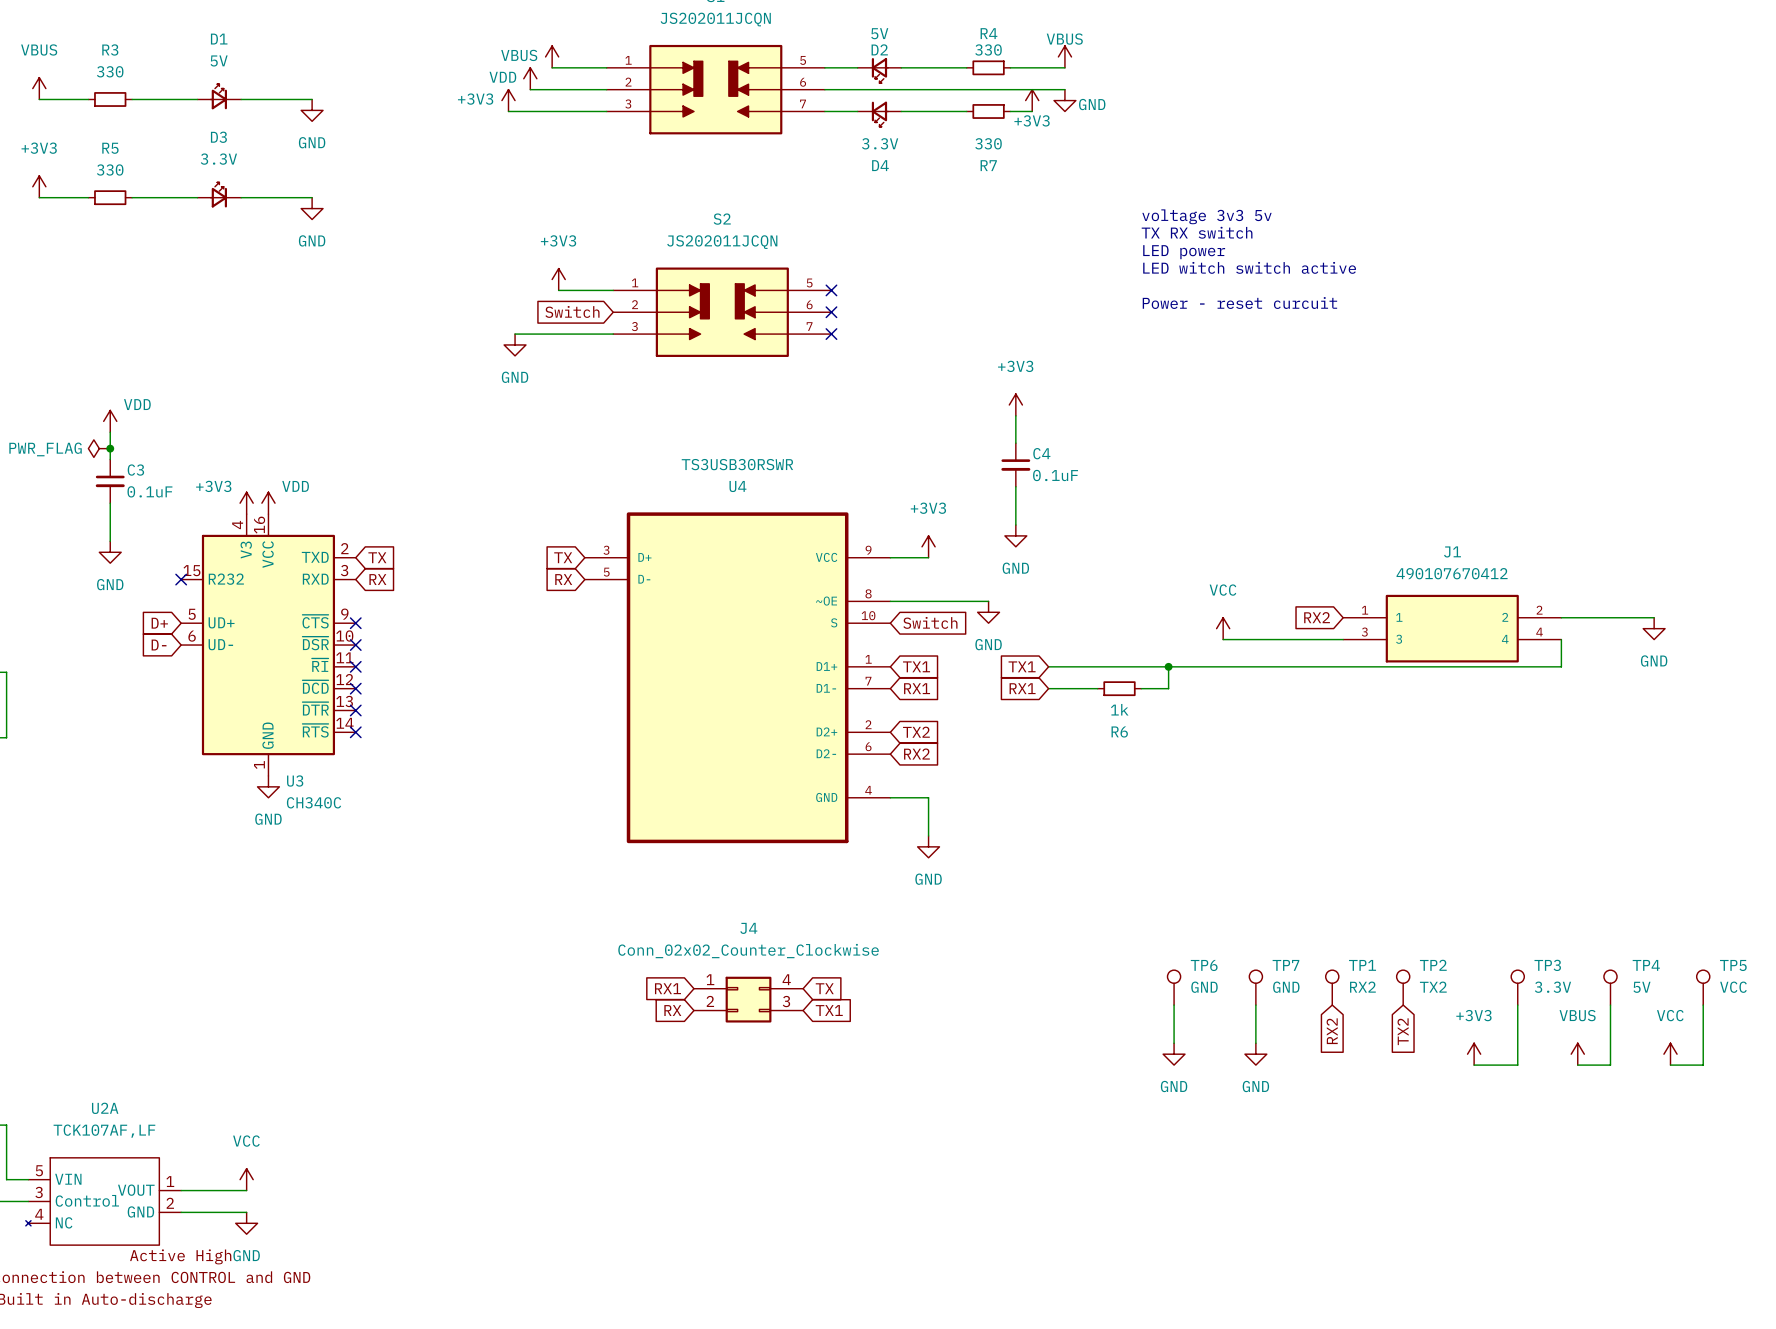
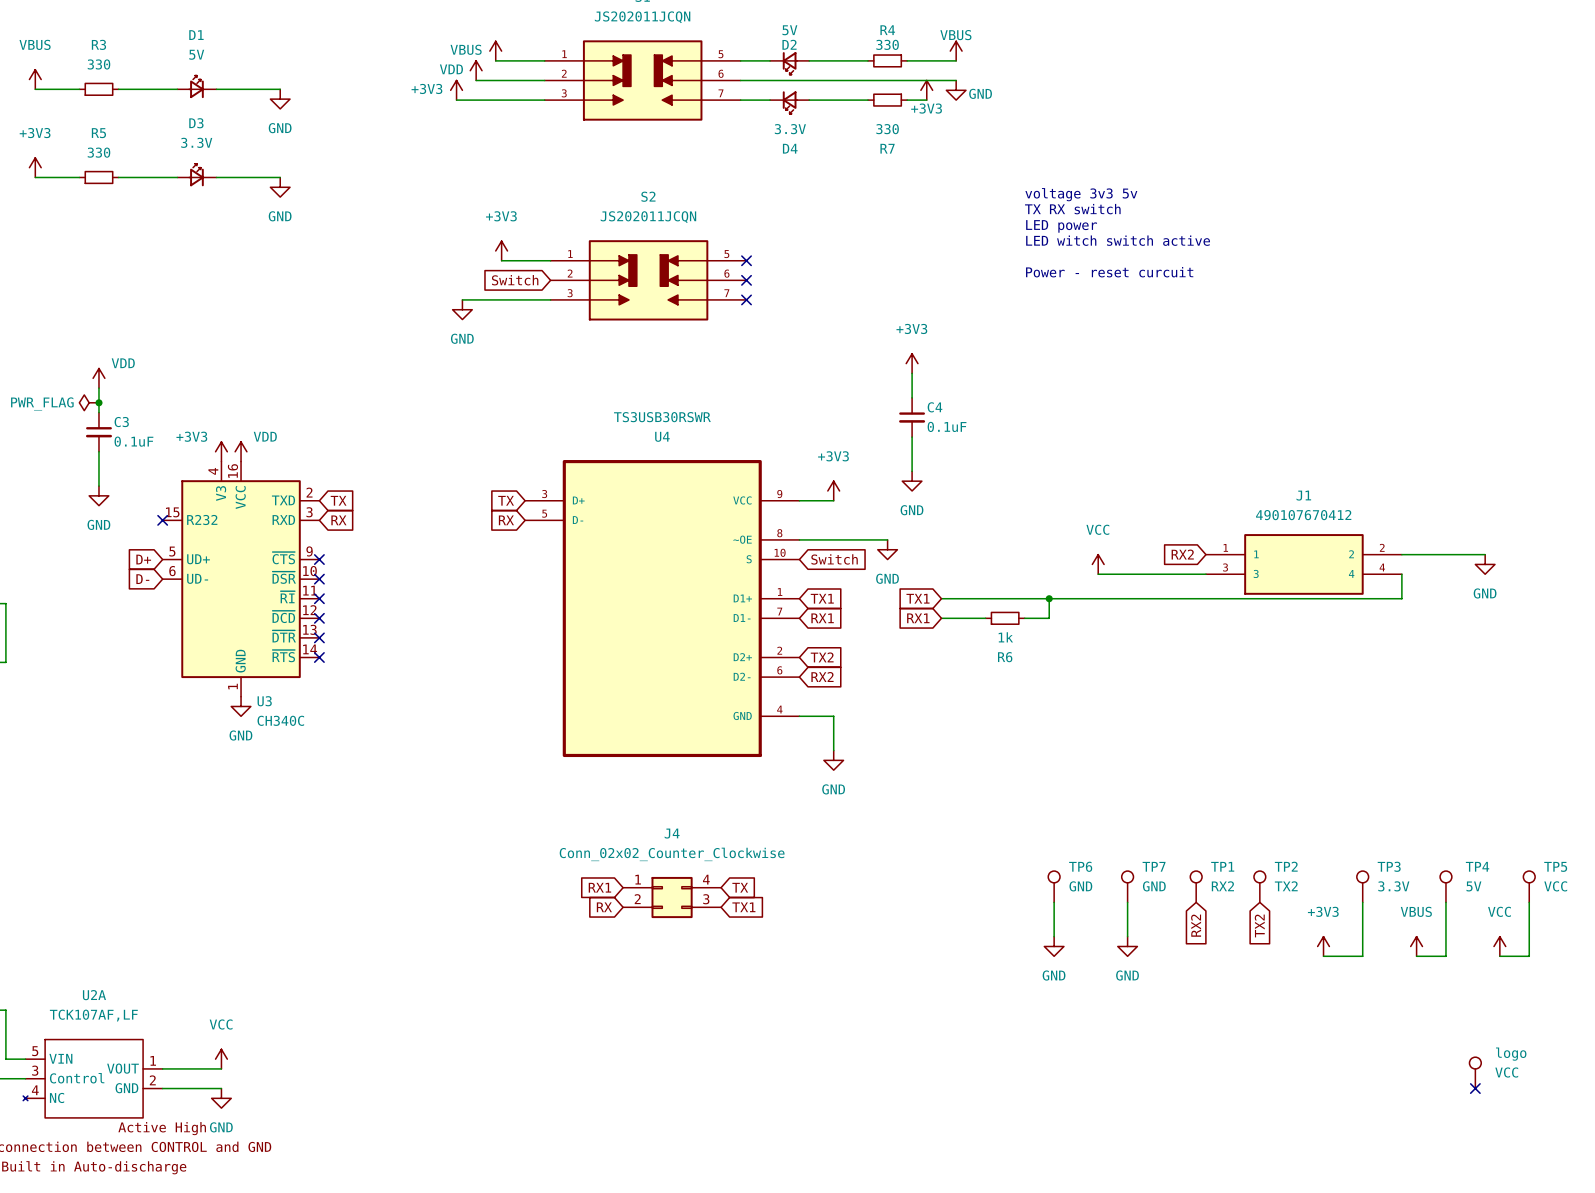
logo: none -> VCC (1475, 1072)
no-connect mark: none -> (1475, 1088)

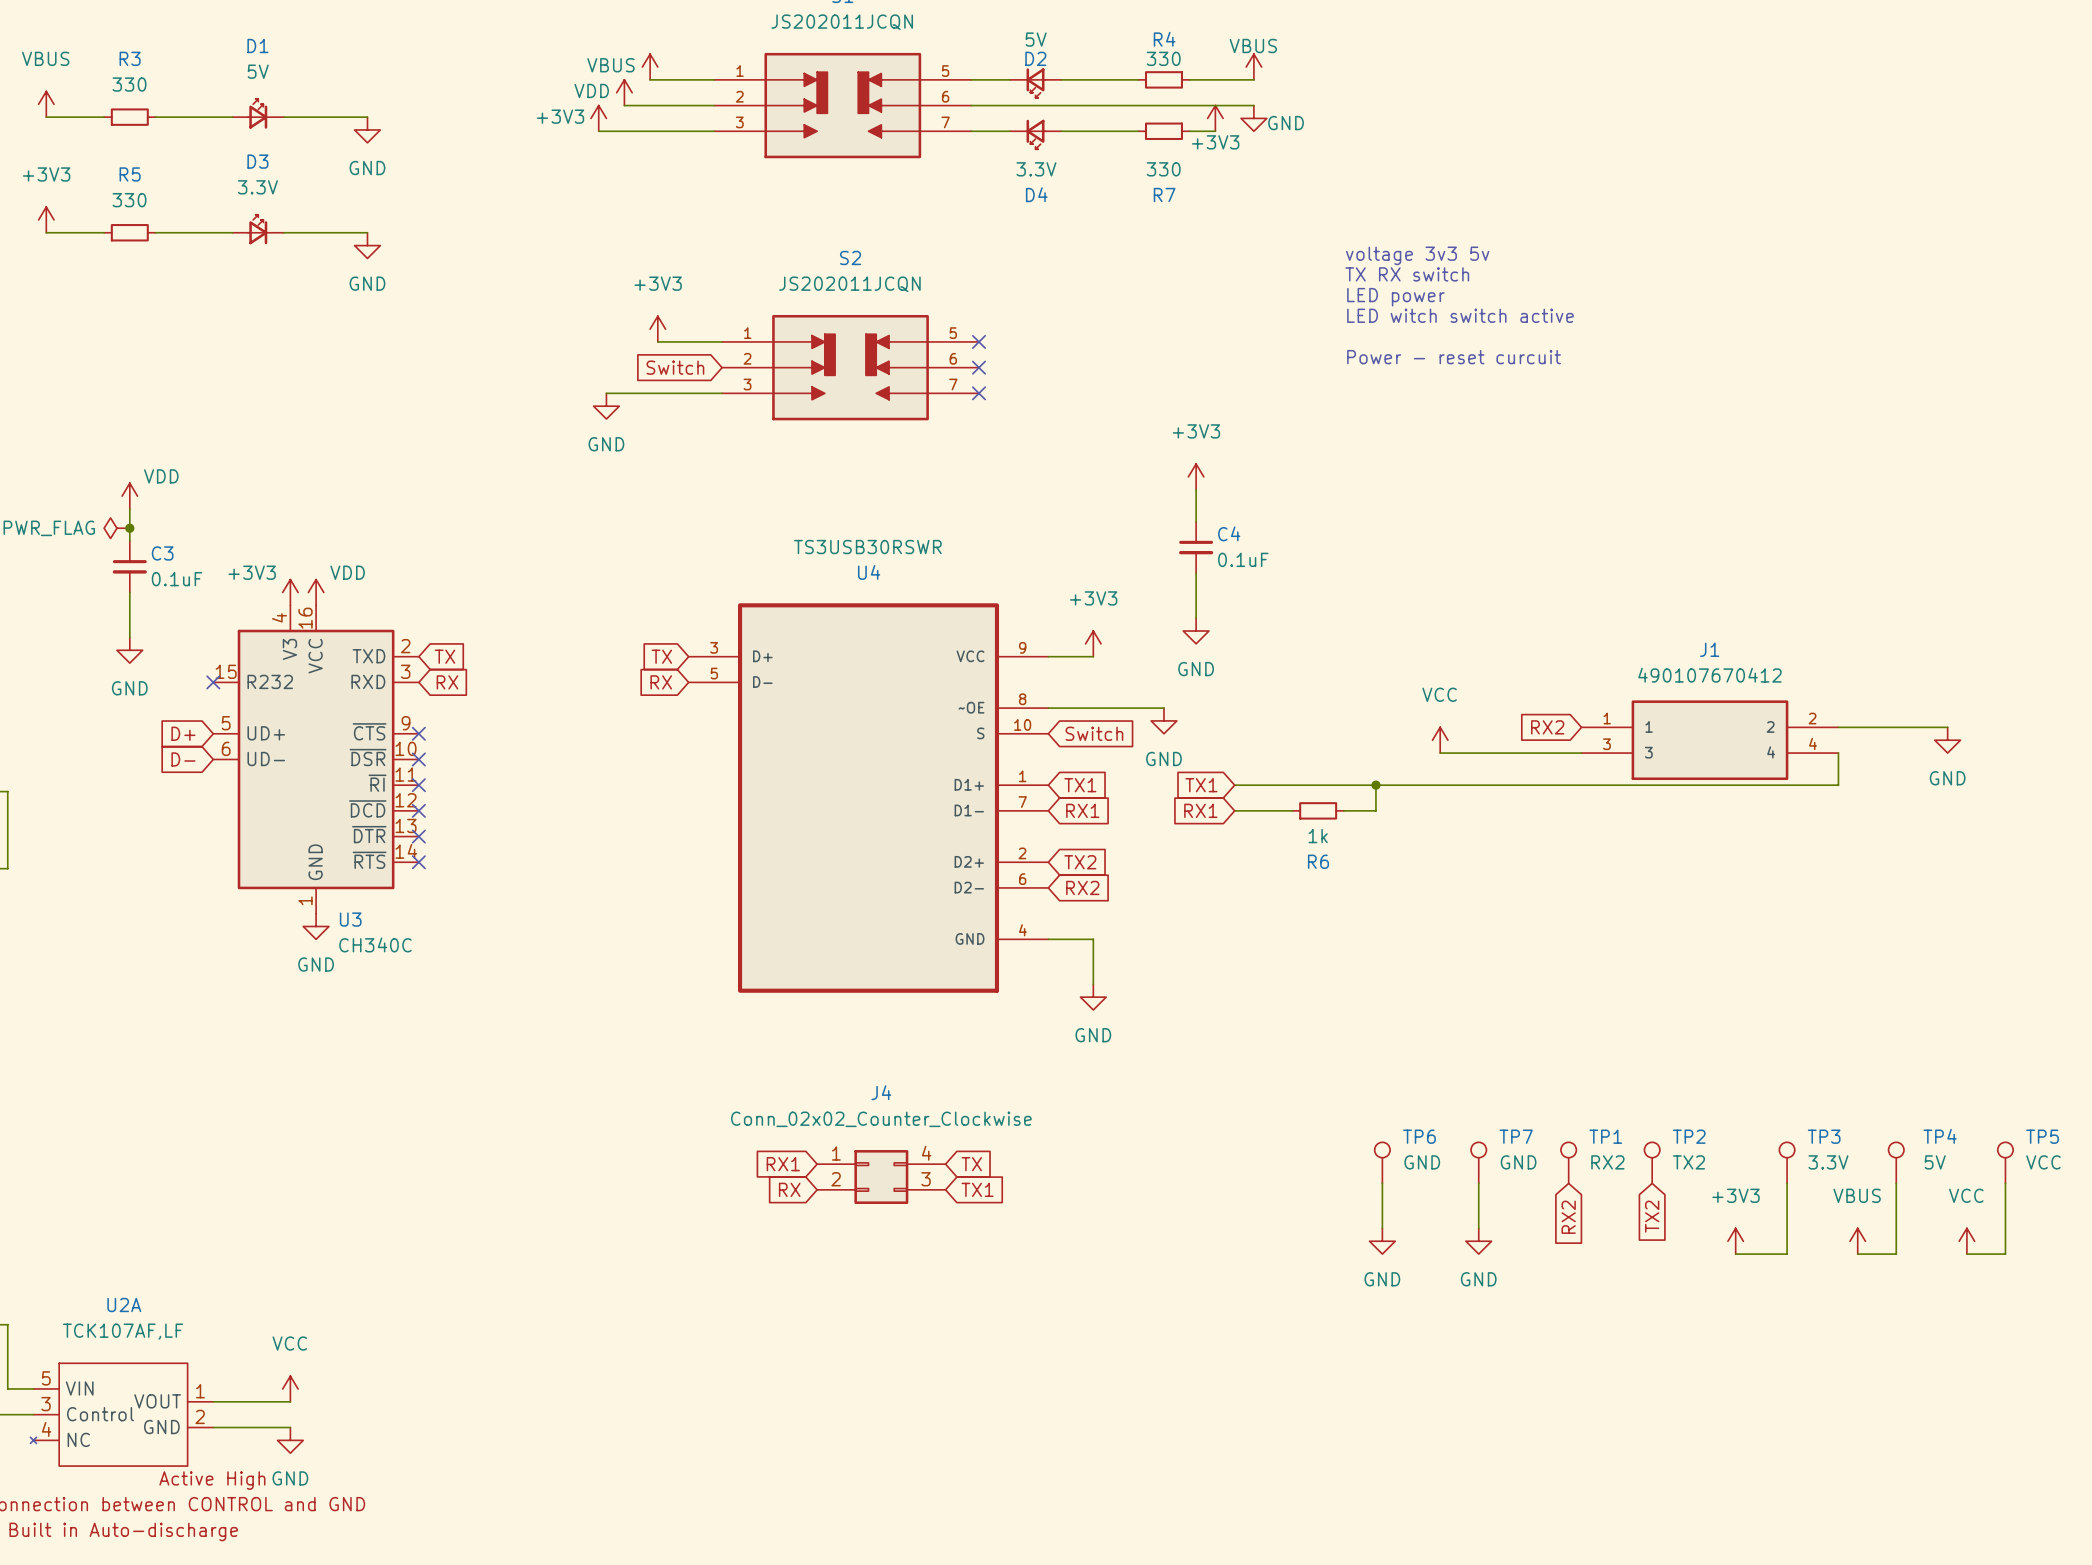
logo: VCC (1475, 1072) -> none
no-connect mark: (1475, 1088) -> none

